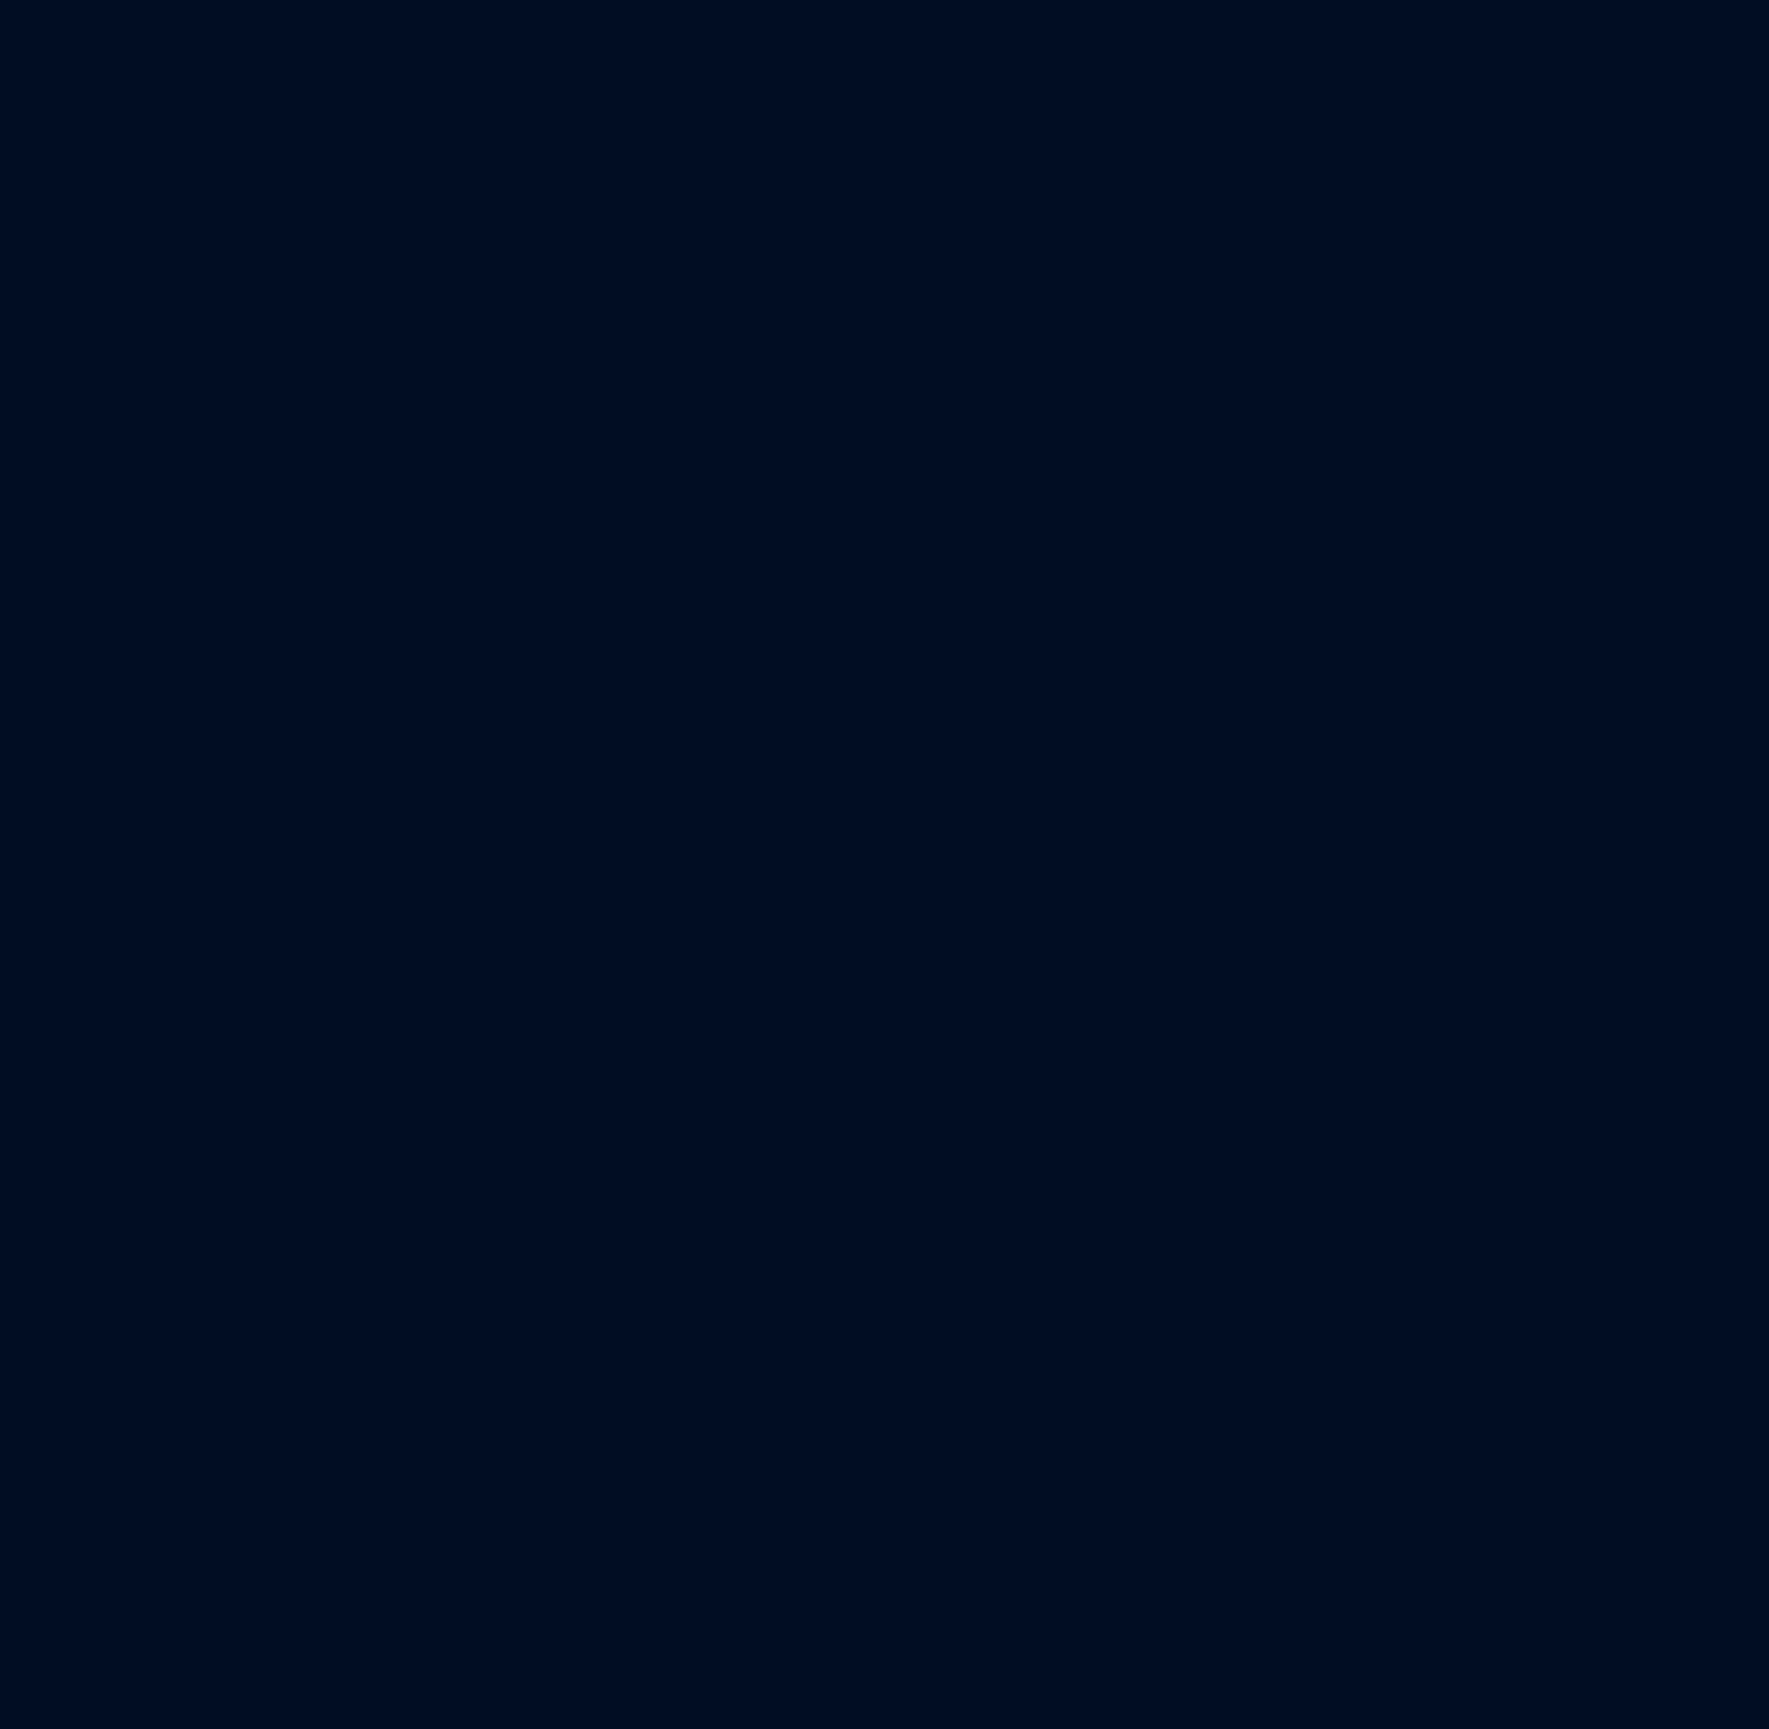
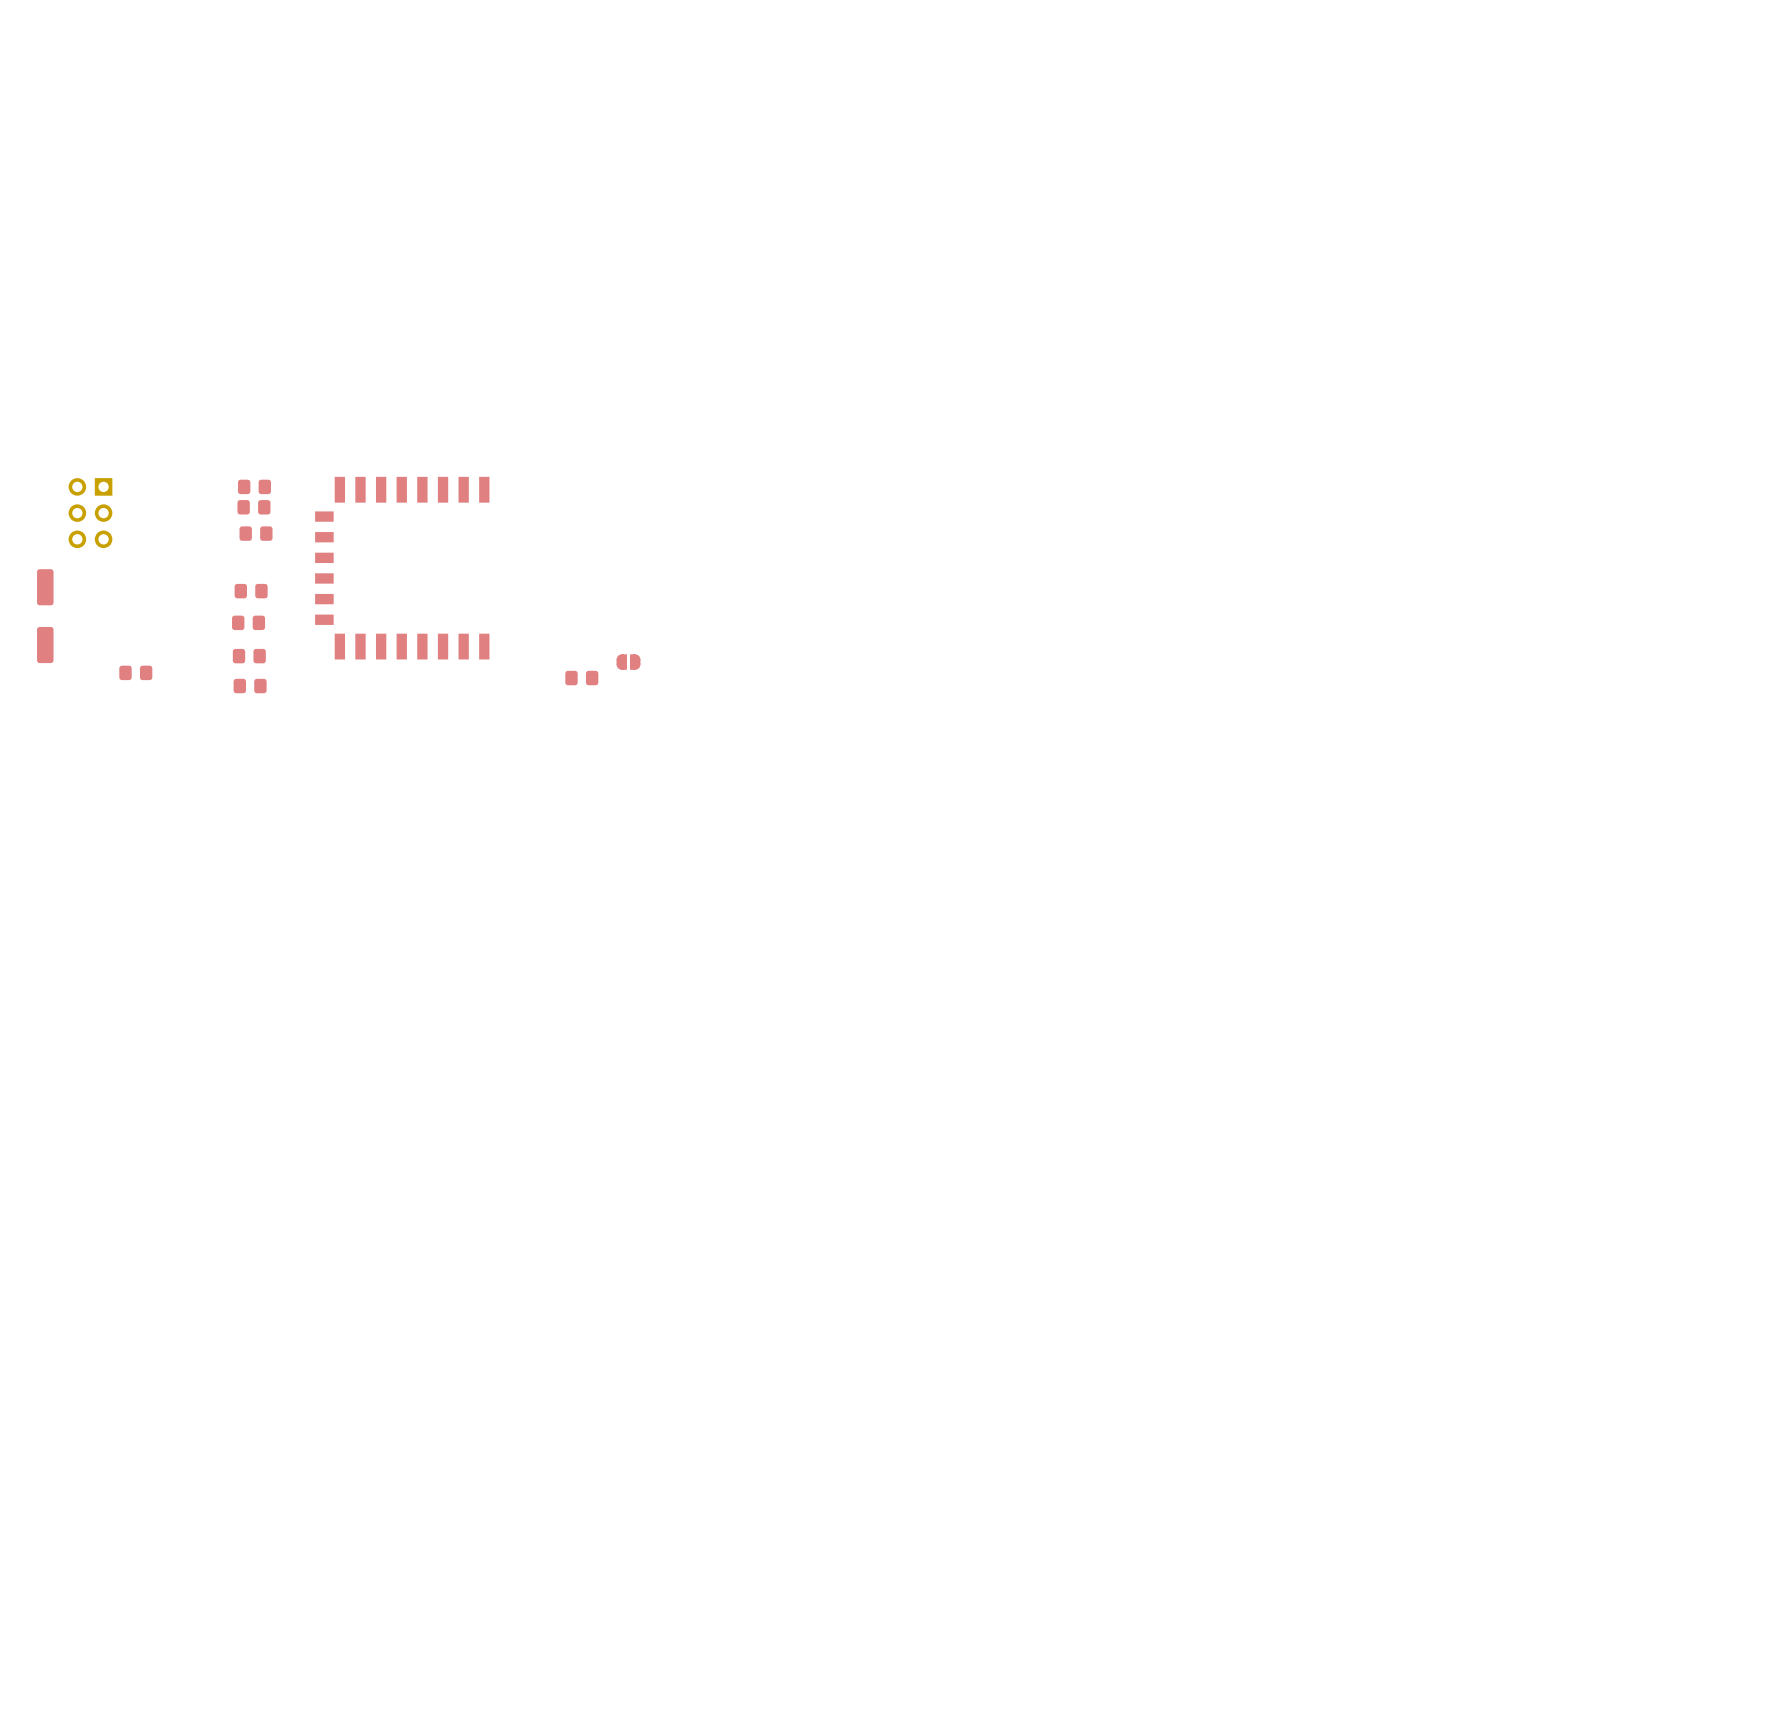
part: none -> (254, 486)
part: none -> (253, 507)
part: none -> (90, 513)
part: none -> (256, 533)
part: none -> (402, 568)
part: none -> (251, 591)
part: none -> (45, 616)
part: none -> (248, 622)
part: none -> (249, 656)
part: none -> (628, 662)
part: none -> (135, 672)
part: none -> (581, 678)
part: none -> (250, 686)

